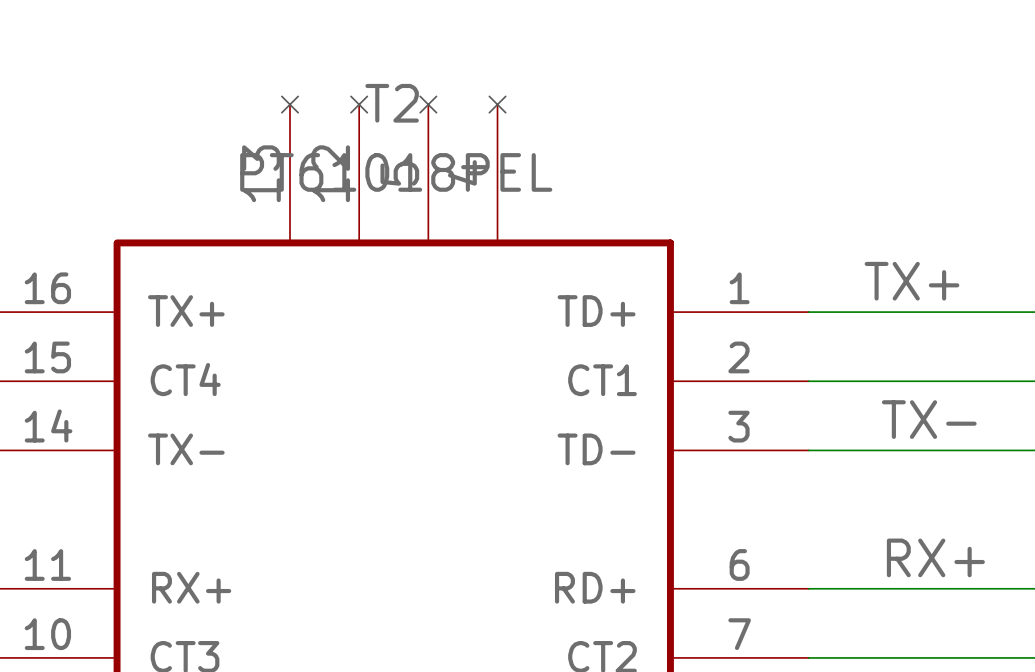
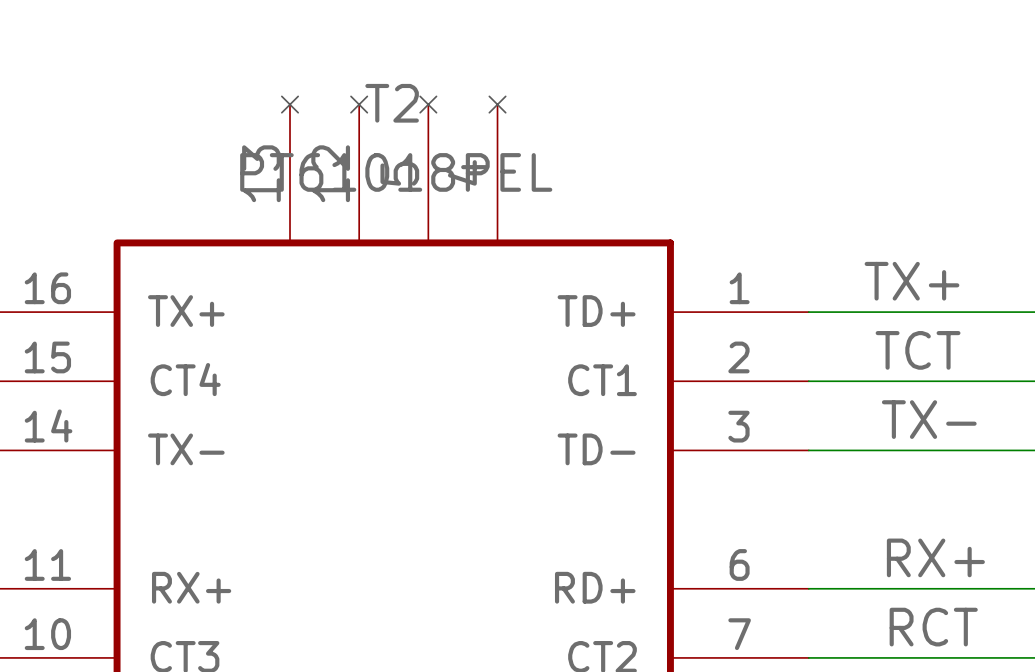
label: none -> TCT (918, 350)
label: none -> RCT (933, 627)

